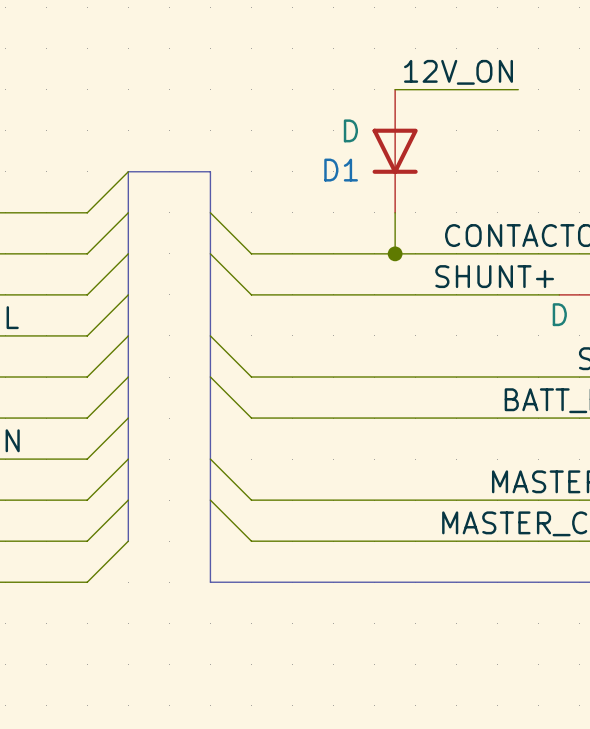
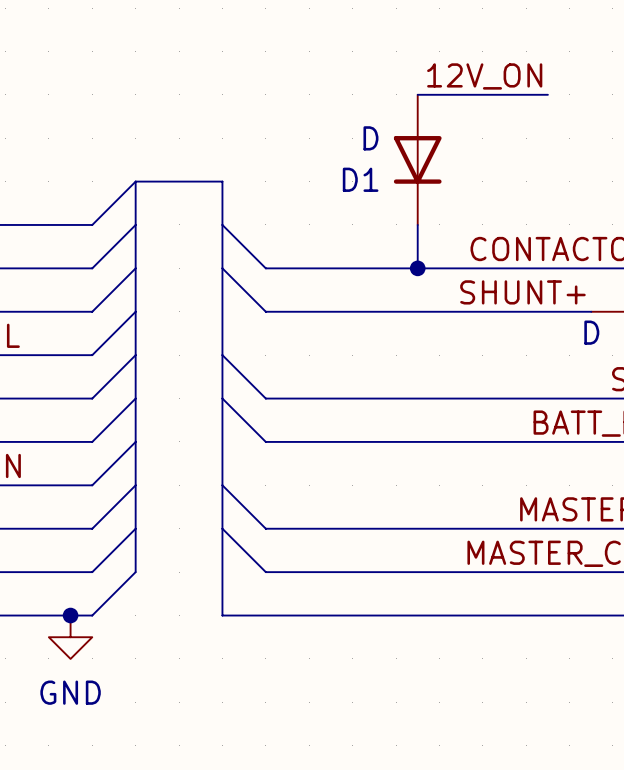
junction: none -> (70, 615)
power symbol: none -> GND (70, 637)

